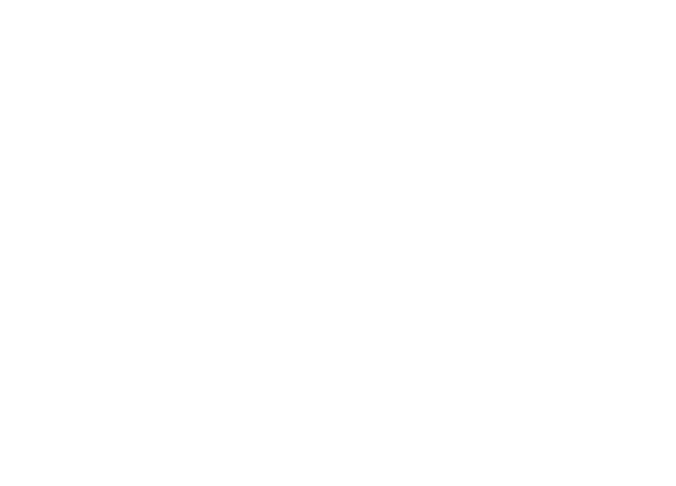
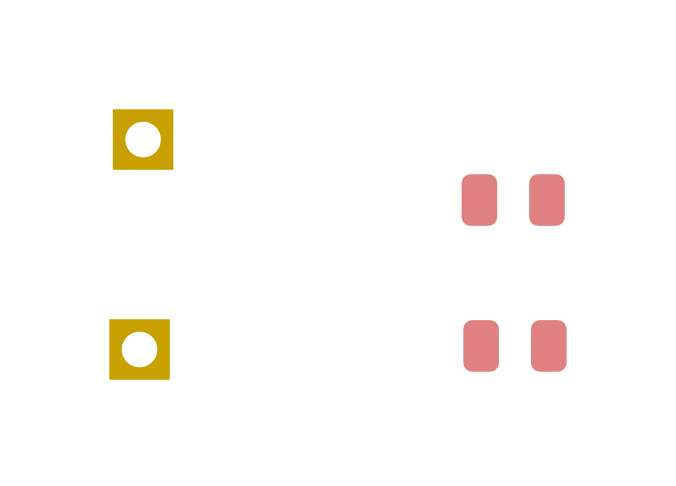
part: none -> (143, 139)
part: none -> (513, 200)
part: none -> (514, 345)
part: none -> (139, 349)

